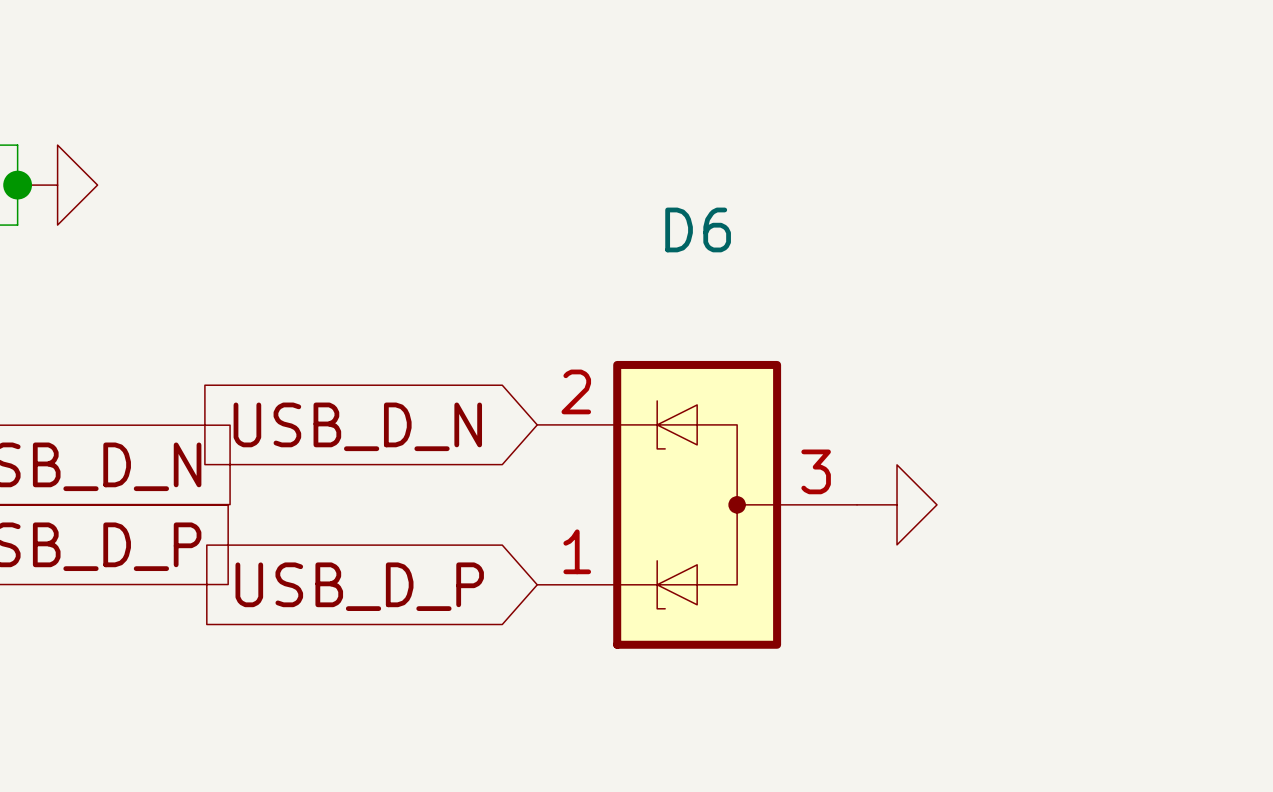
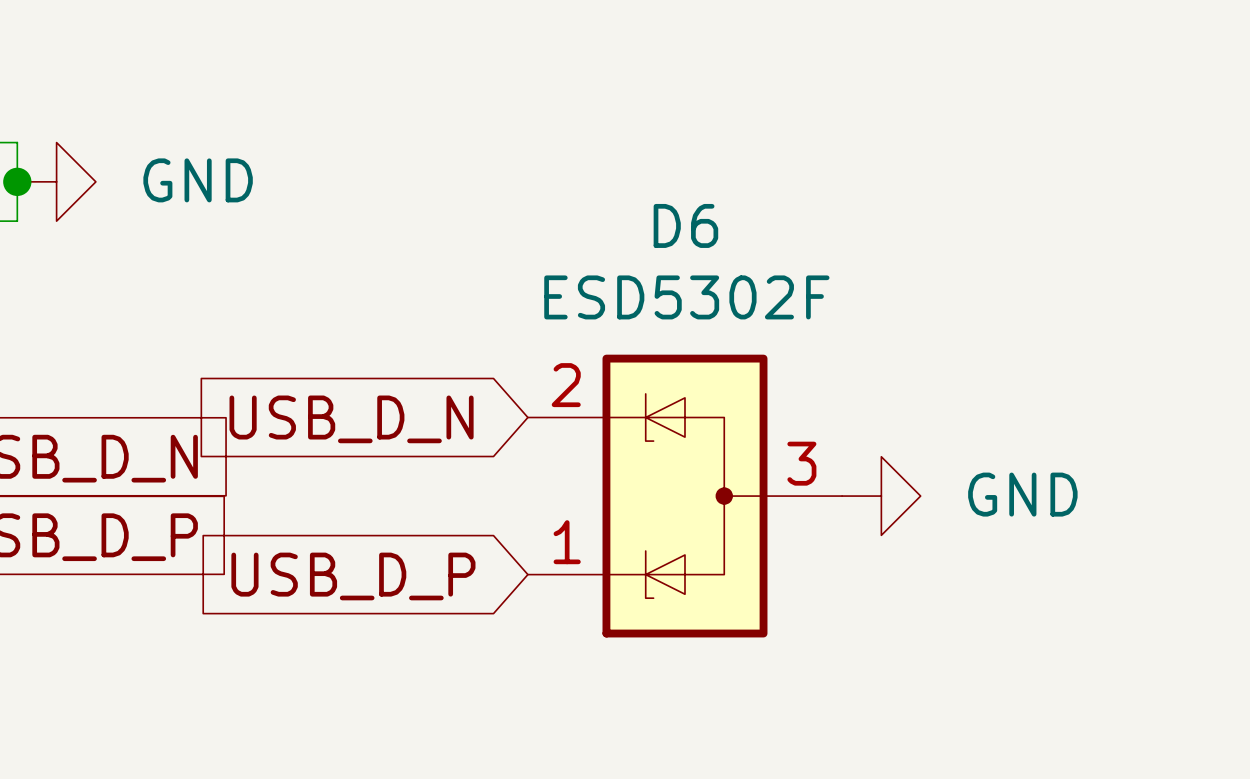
power symbol text: none -> GND (198, 180)
D6 value: none -> ESD5302F (686, 297)
power symbol text: none -> GND (1022, 494)

